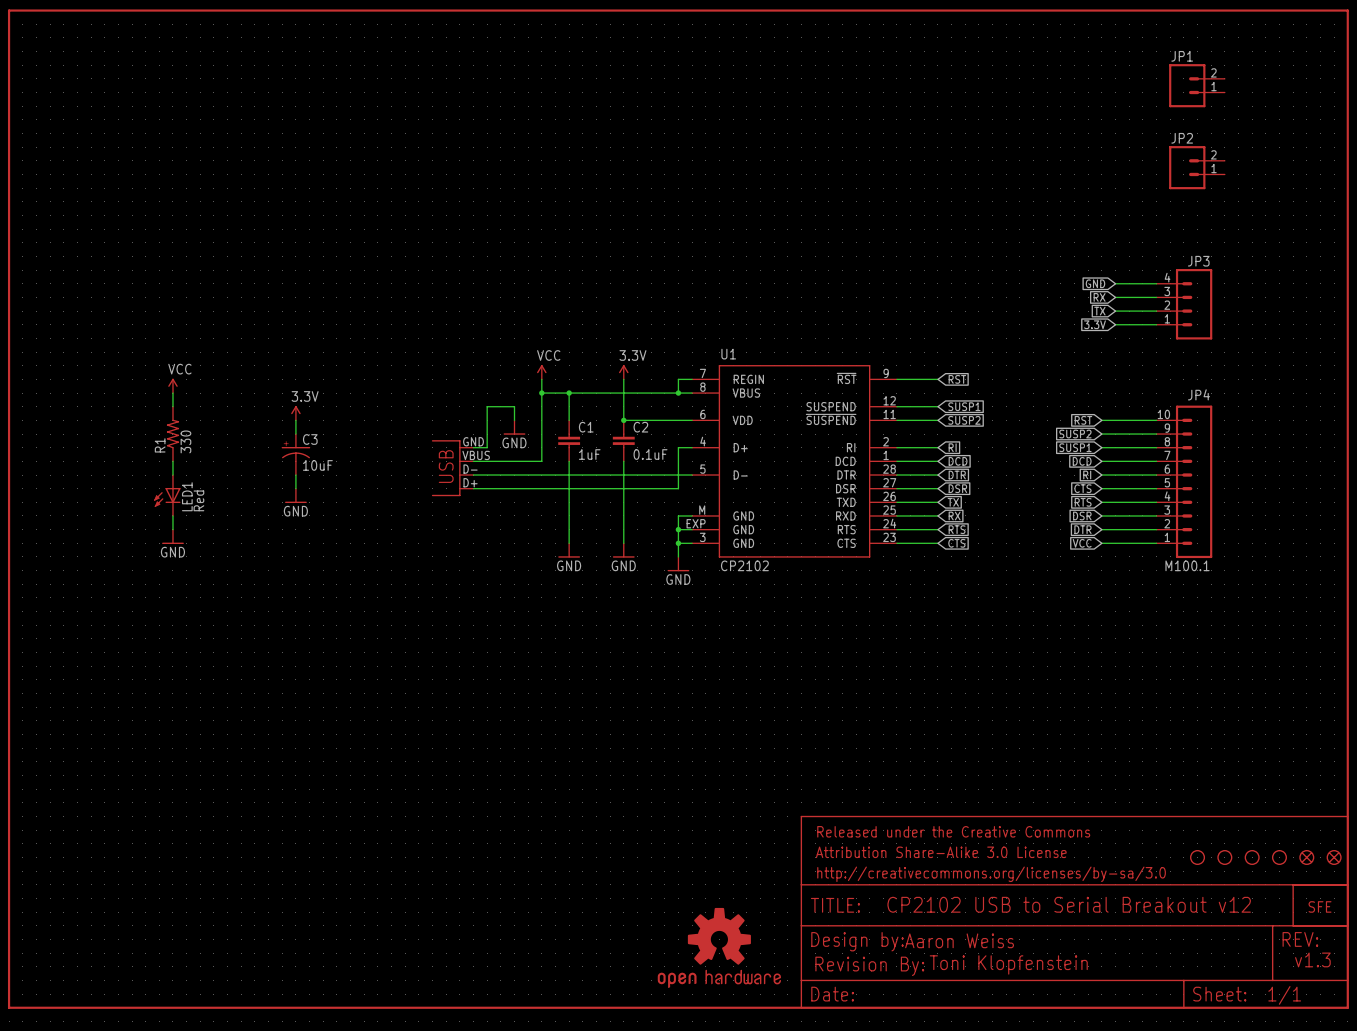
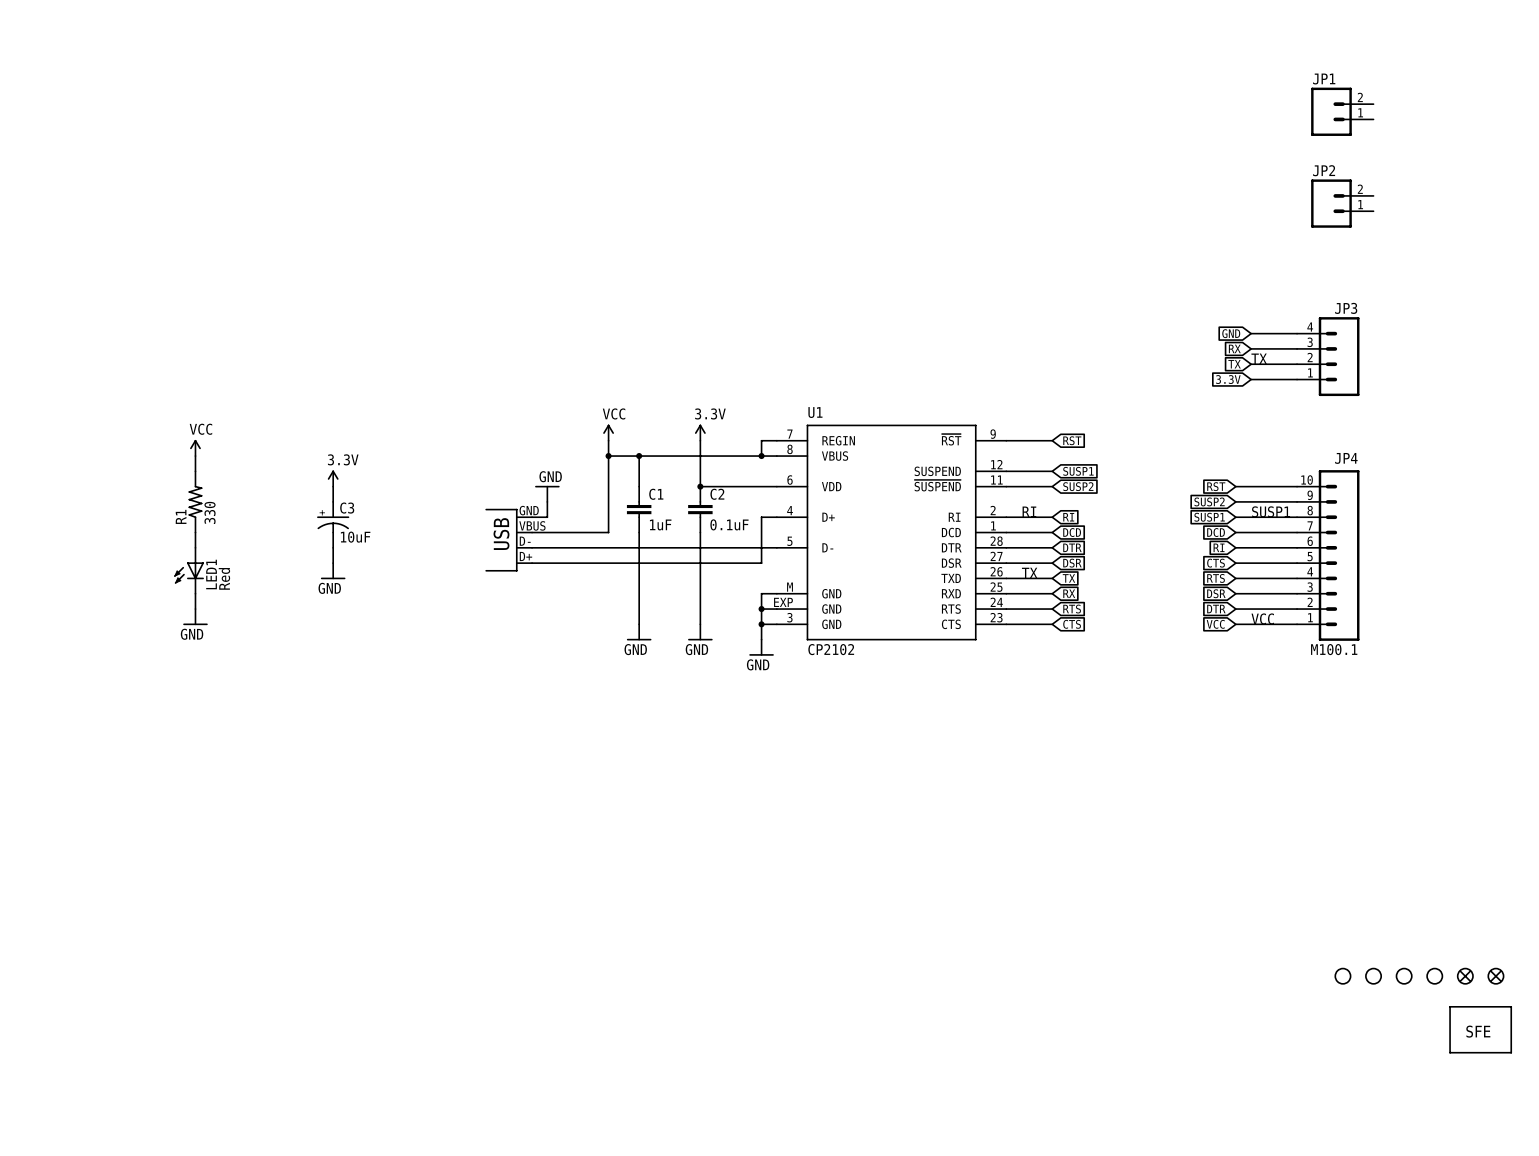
label: none -> TX (1259, 358)
wire: (514, 420) (514, 406) (487, 406) (487, 434) -> none
power symbol position: GND (514, 427) -> GND (547, 493)
power symbol rotation: 0° (514, 434) -> 180° (547, 486)
label: none -> RI (1029, 511)
label: none -> SUSP1 (1271, 511)
label: none -> TX (1029, 573)
part: (678, 509) -> none
label: none -> VCC (1262, 618)
part: (1074, 912) -> none
text: Aaron Weiss (959, 940) -> none
part: (719, 947) -> none
text: v1.3 (1312, 959) -> none
text: Toni Klopfenstein (1008, 964) -> none
part: (869, 966) -> none

